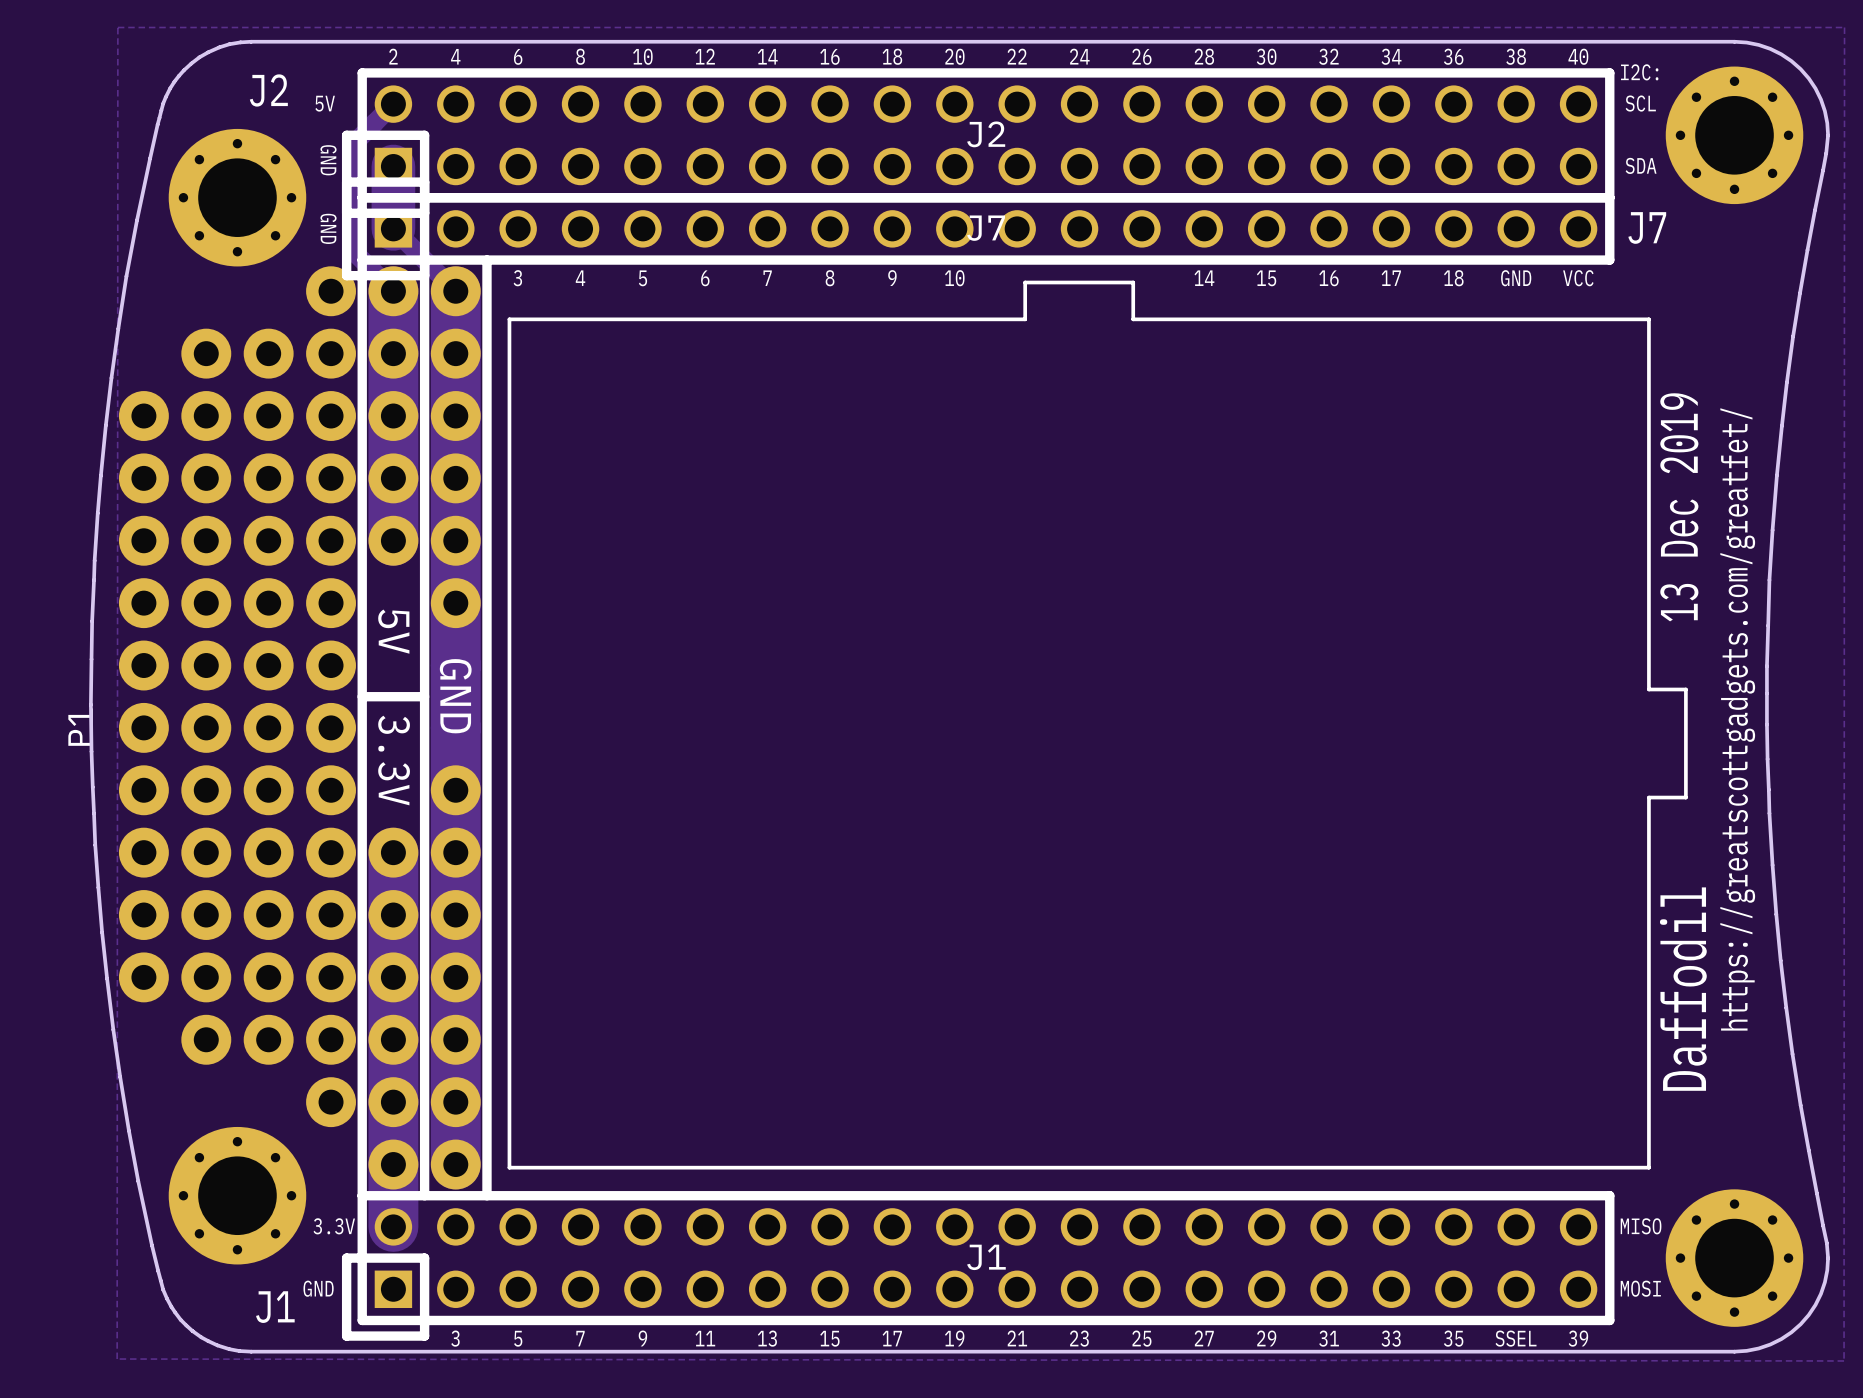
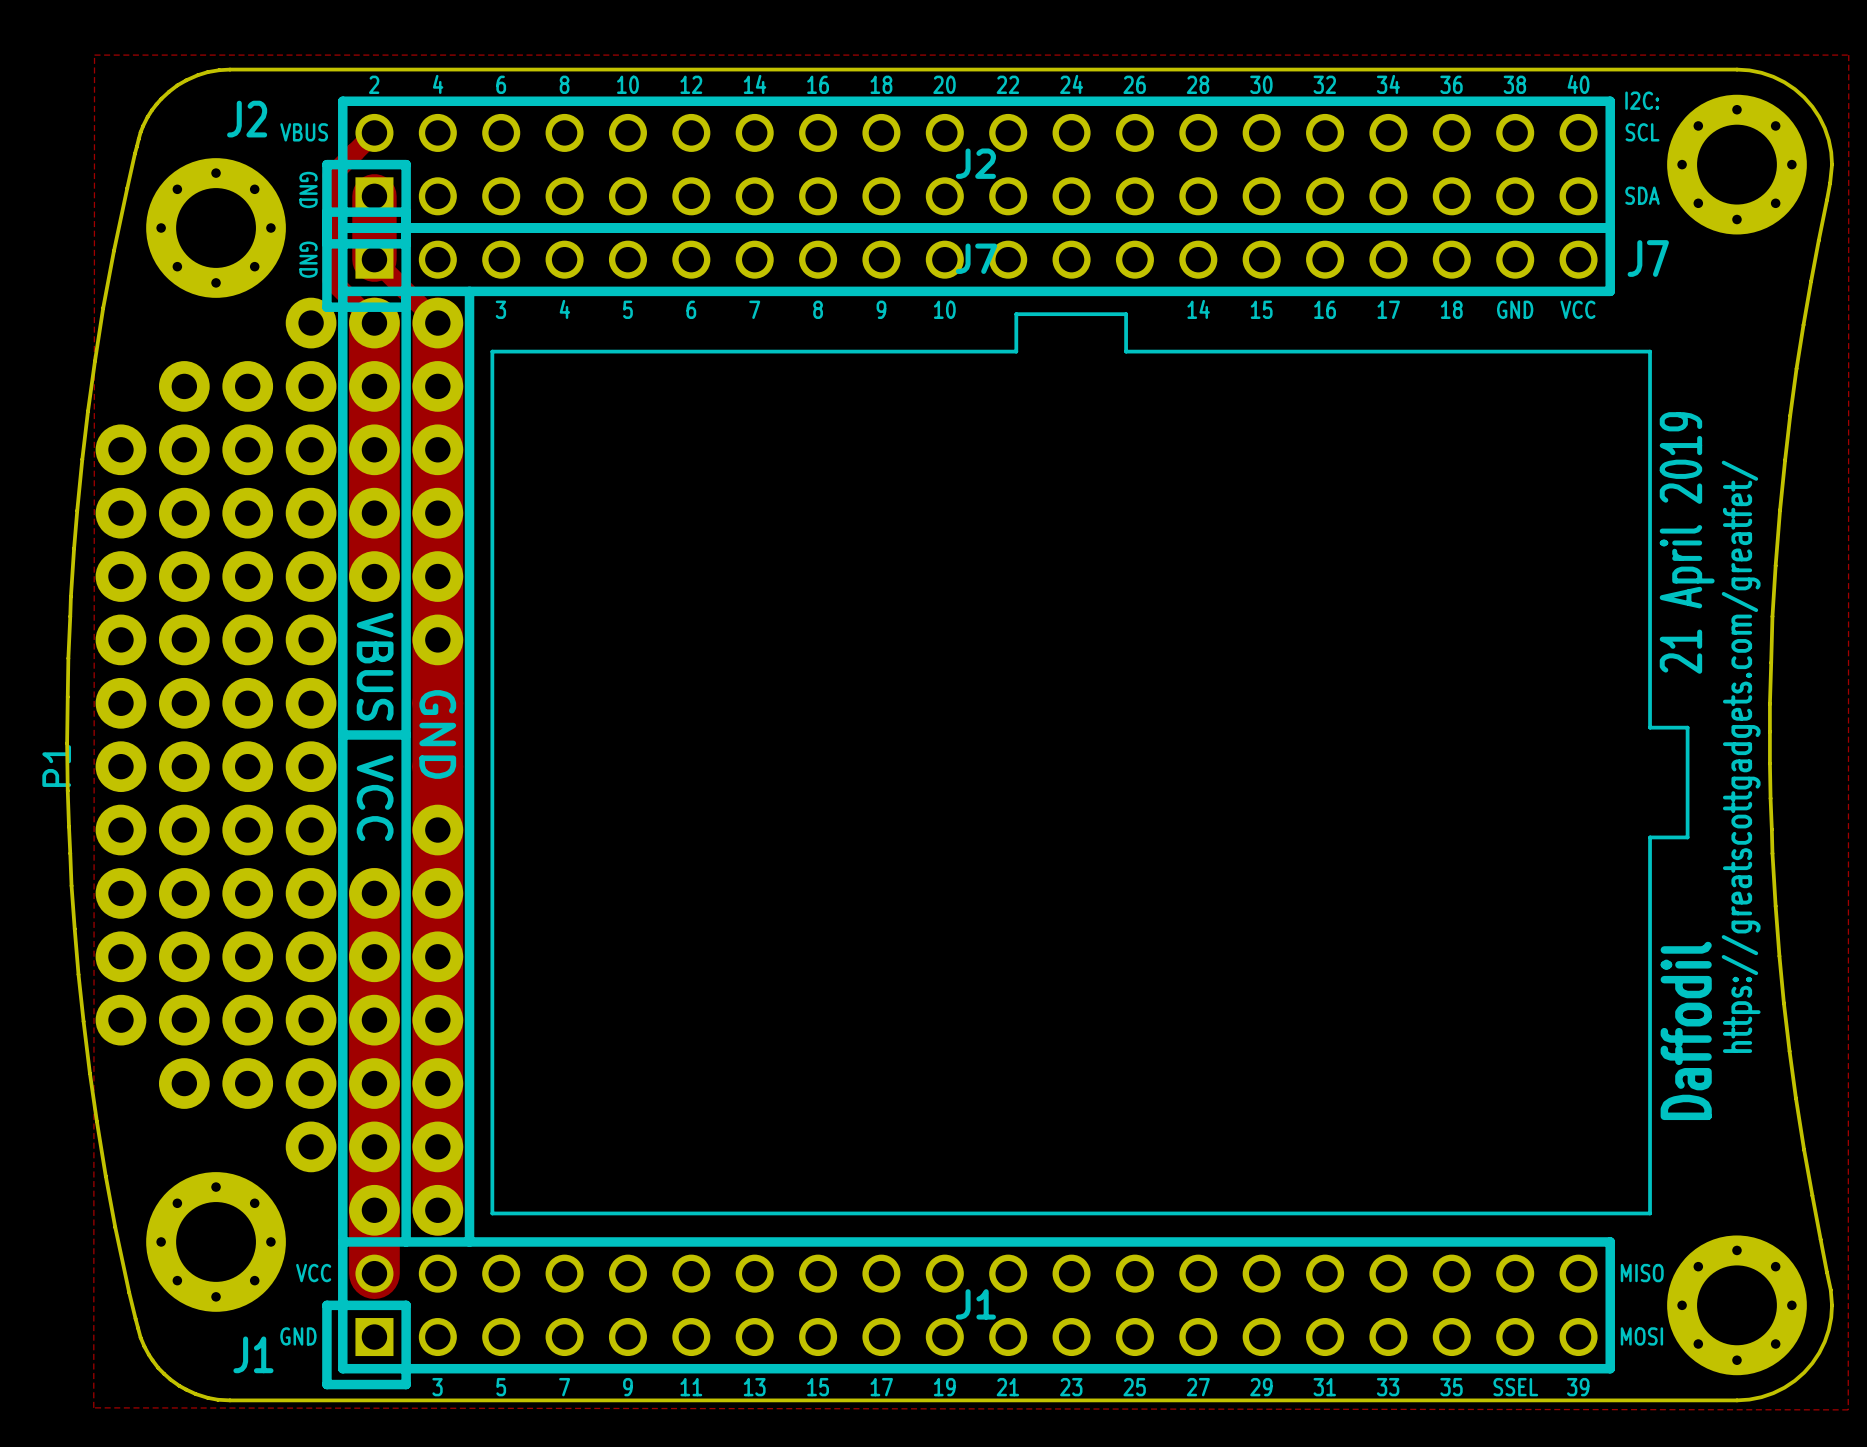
text: 5V (325, 103) -> VBUS (304, 132)
text: 13 Dec 2019 (1679, 507) -> 21 April 2019 (1687, 542)
text: 5V (393, 631) -> VBUS (375, 666)
text: 3.3V (394, 760) -> VCC (375, 798)
text: 3.3V (334, 1226) -> VCC (313, 1273)

